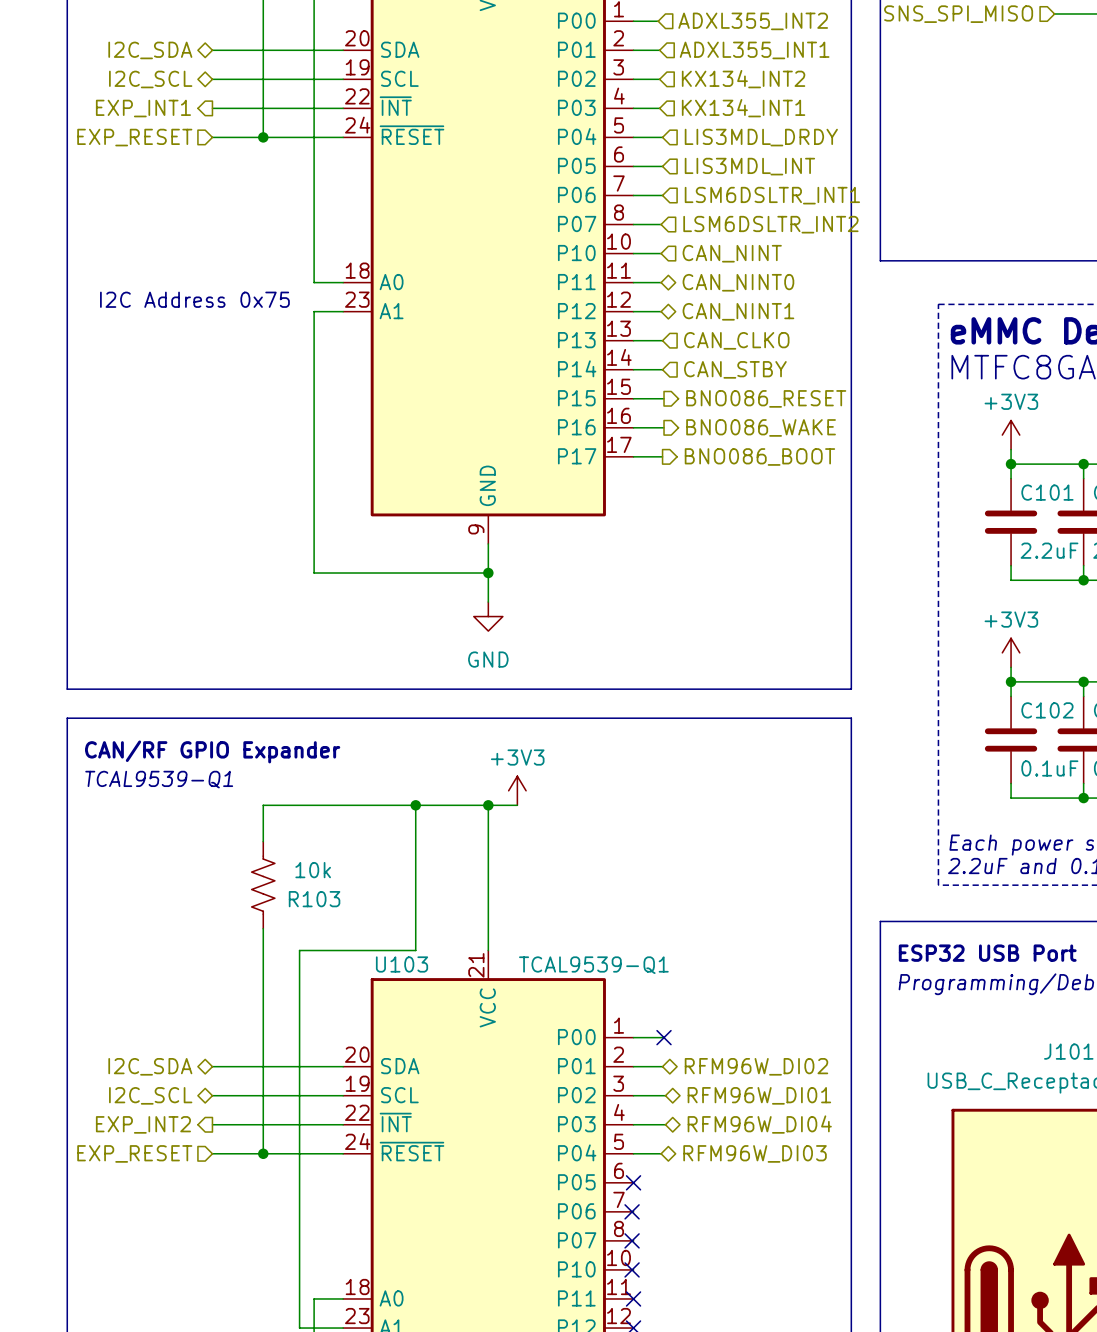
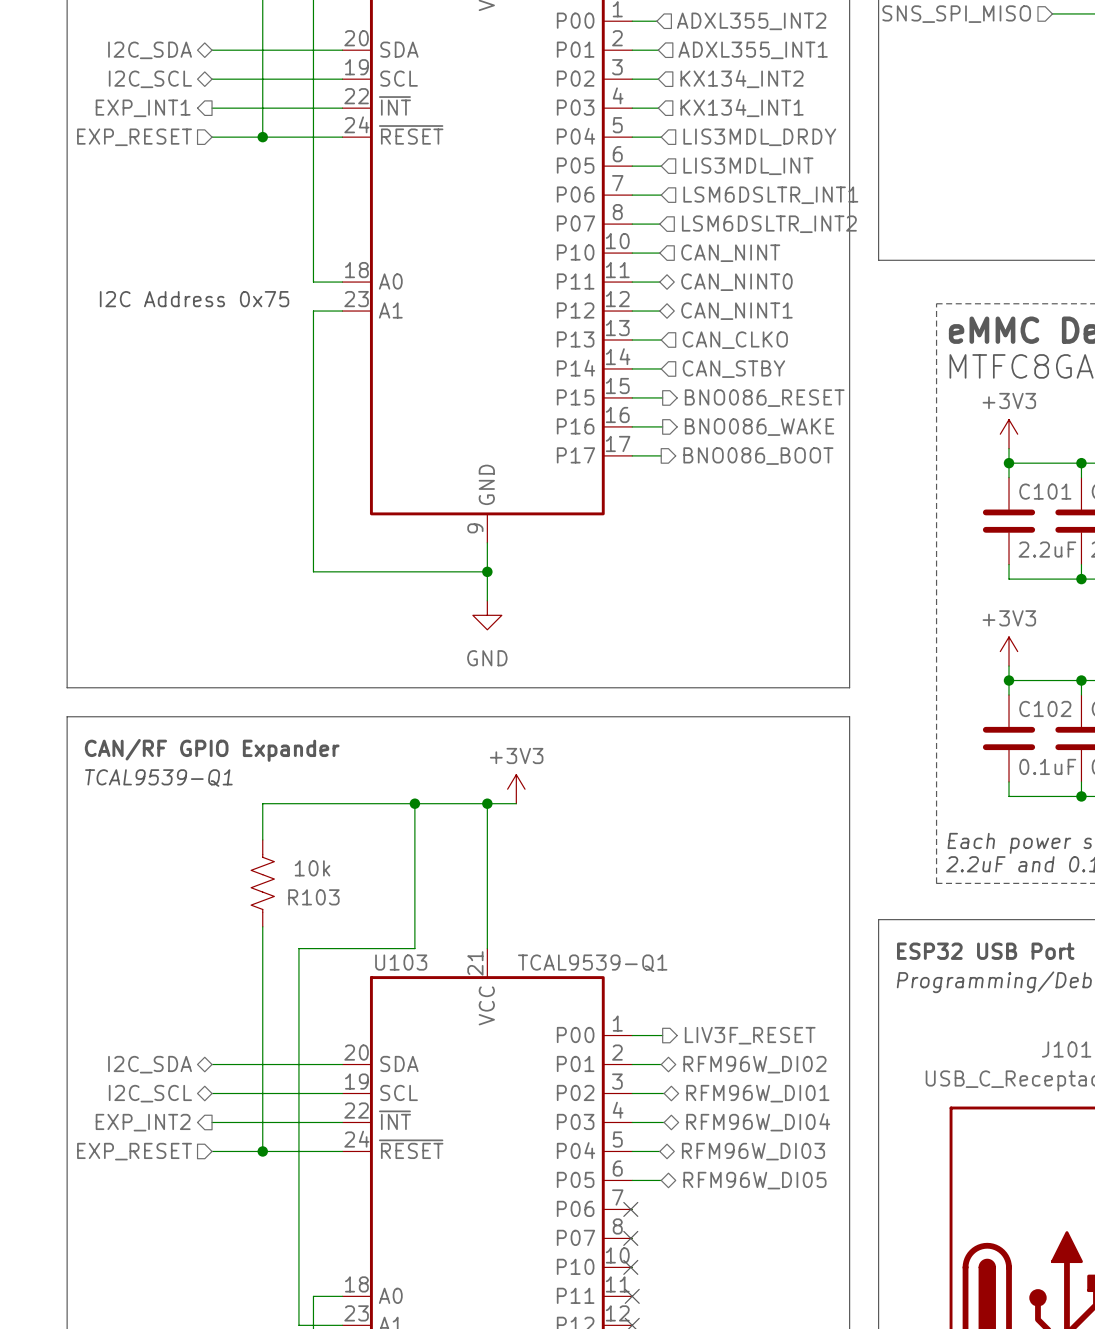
no-connect mark: (664, 1037) -> none
hierarchical label: none -> LIV3F_RESET (750, 1035)
wire: none -> (632, 1180) (661, 1180)
no-connect mark: (633, 1182) -> none
hierarchical label: none -> RFM96W_DI05 (754, 1180)

